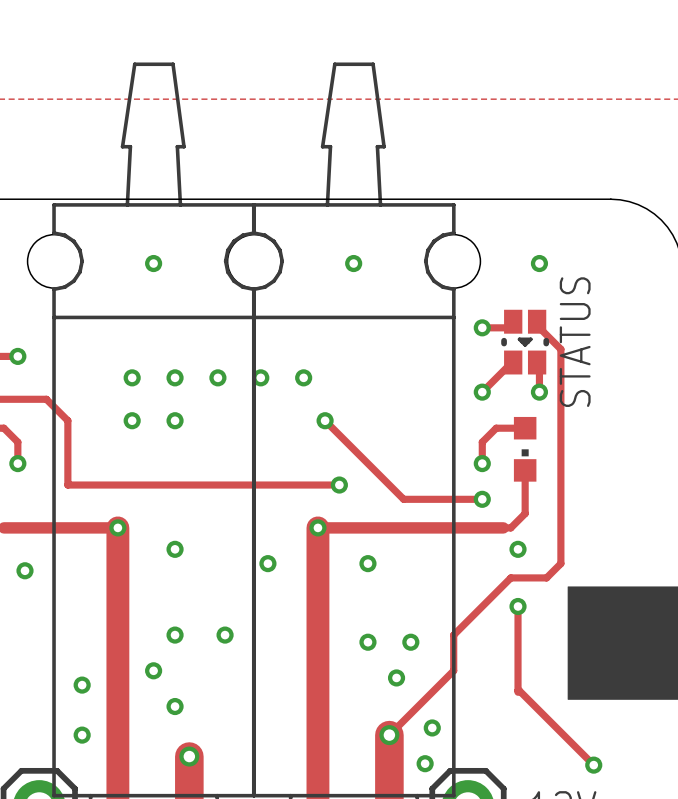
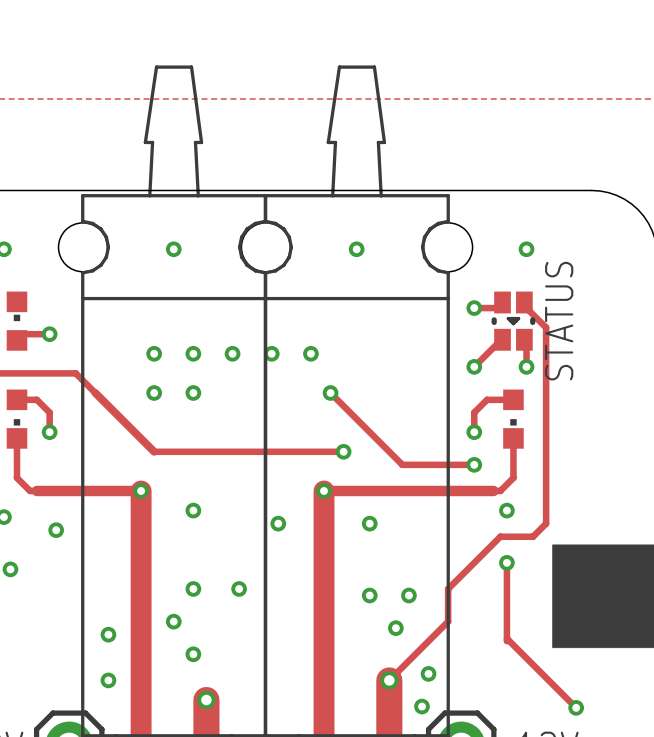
track: (67, 420) (67, 485) (132, 485) -> (95, 392) (154, 451)

